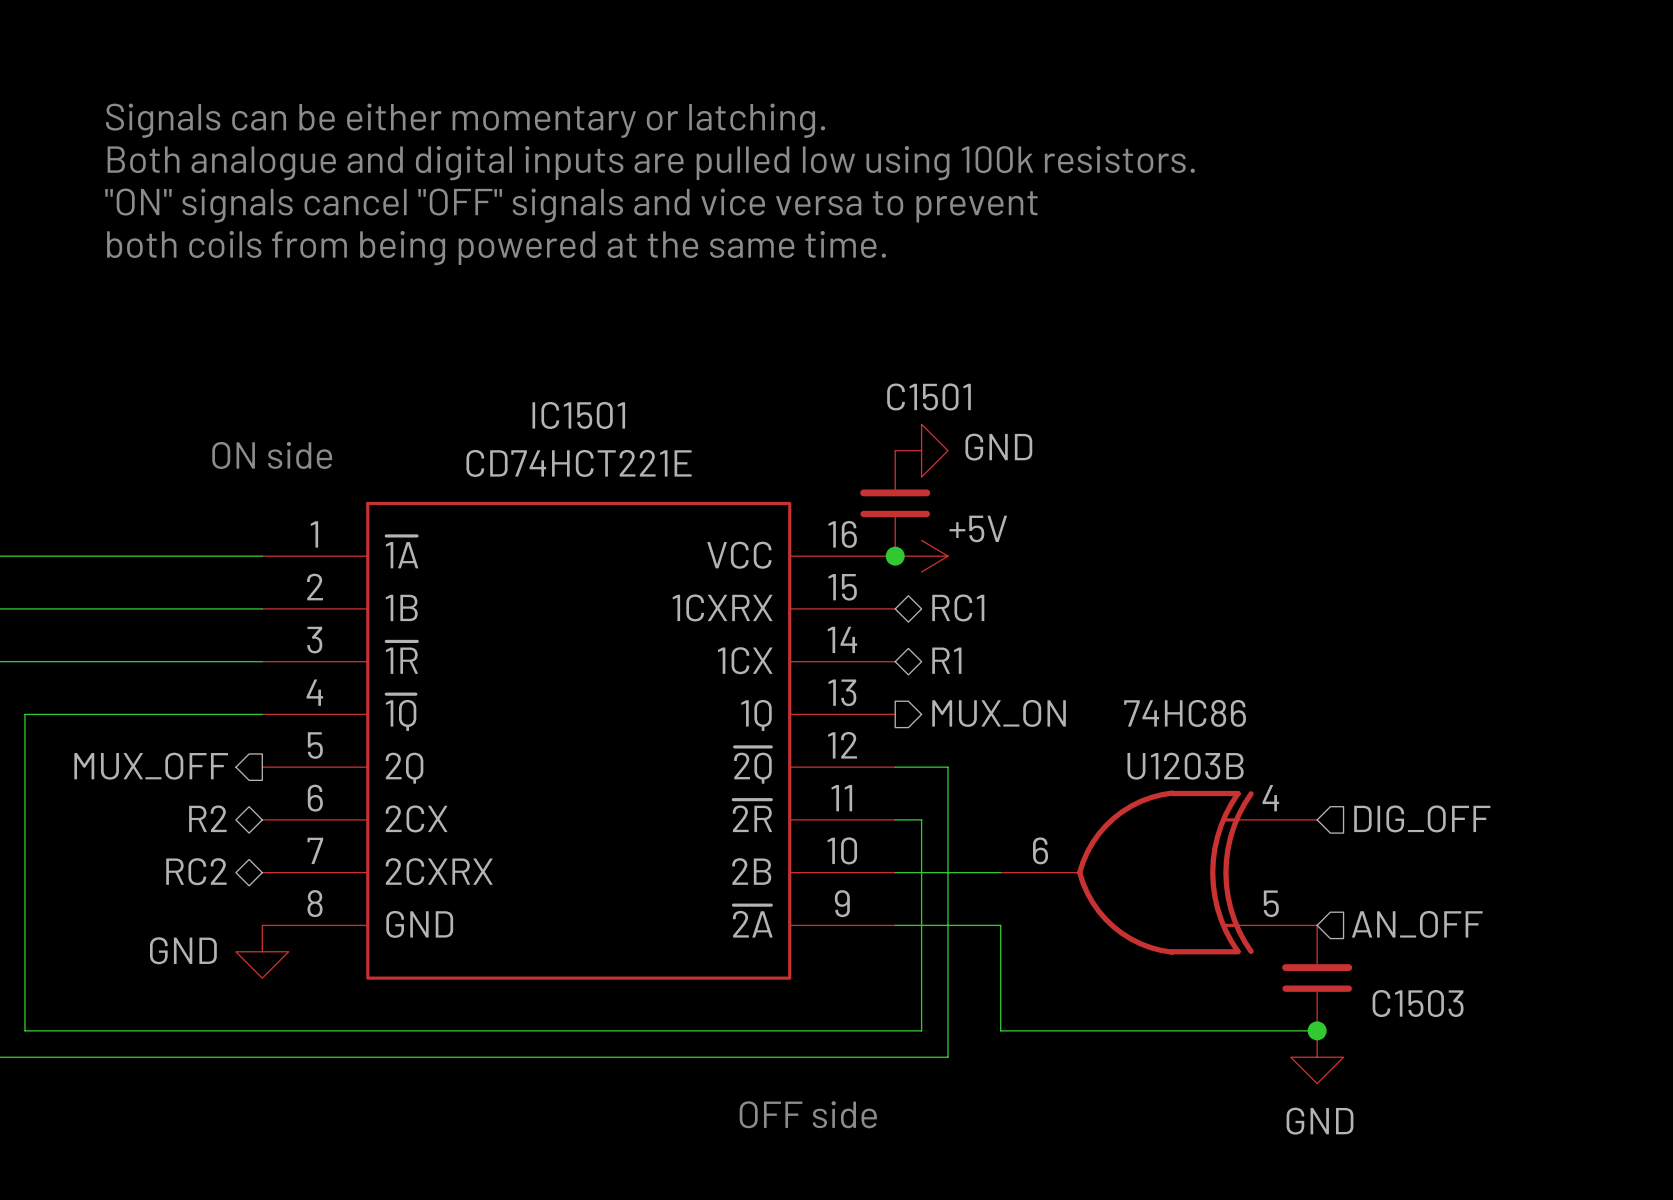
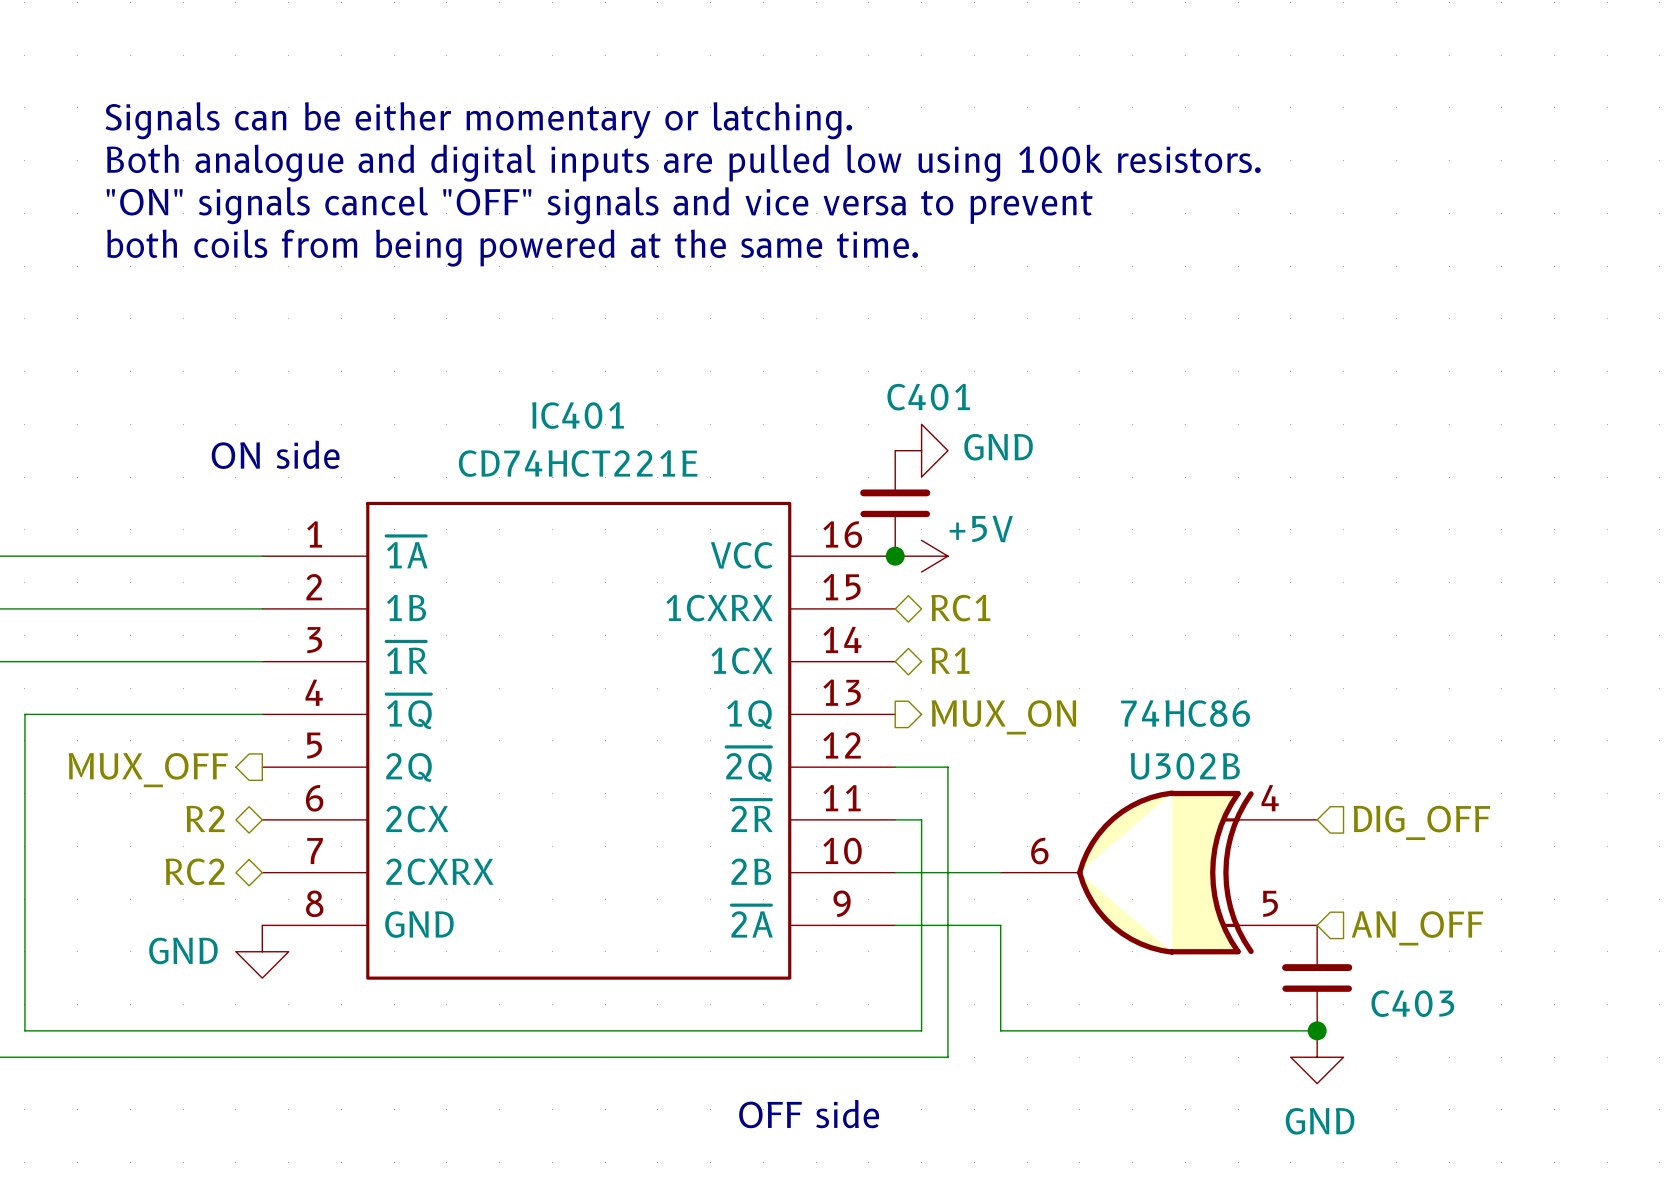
C1501 name: C1501 (929, 396) -> C401 (928, 397)
IC1501 name: IC1501 (578, 415) -> IC401 (577, 415)
U1203B name: U1203B (1185, 766) -> U302B (1185, 766)
C1503 name: C1503 (1418, 1003) -> C403 (1412, 1003)

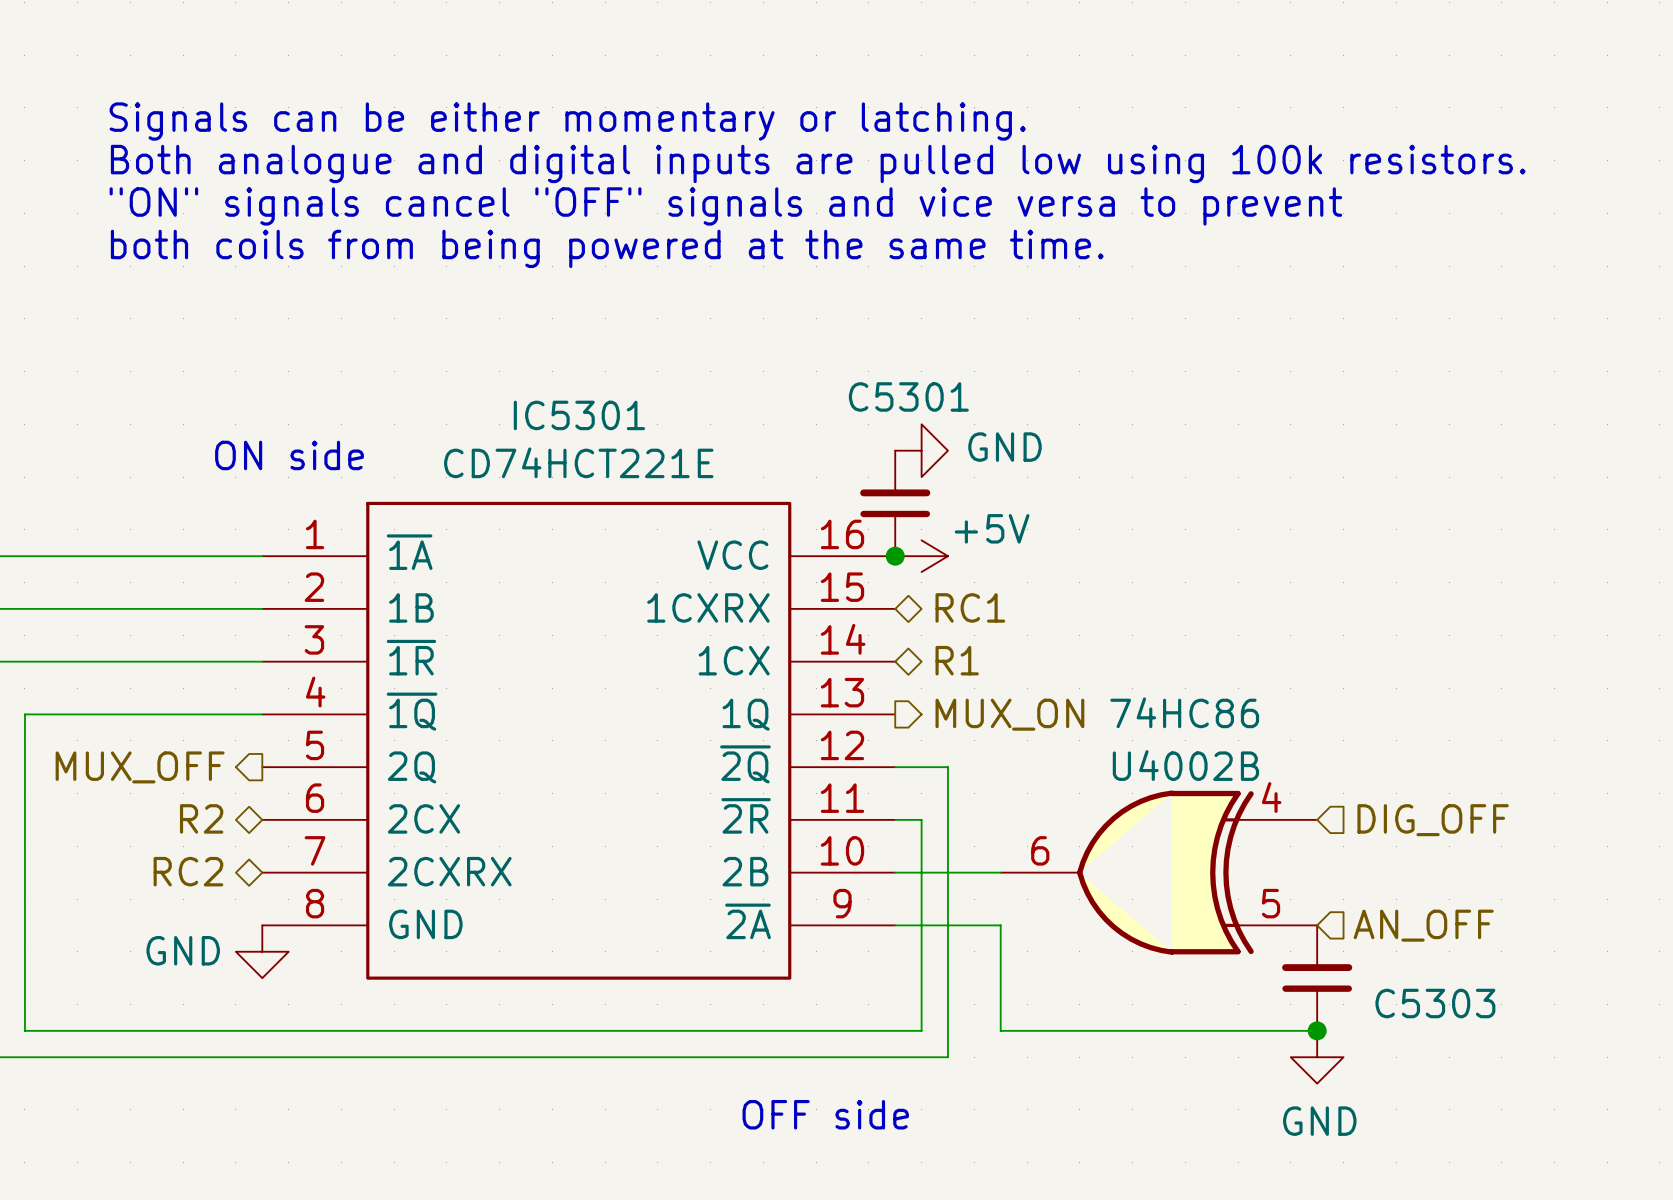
C401 name: C401 (928, 397) -> C5301 (908, 396)
IC401 name: IC401 (577, 415) -> IC5301 (579, 415)
U302B name: U302B (1185, 766) -> U4002B (1185, 765)
C403 name: C403 (1412, 1003) -> C5303 (1435, 1003)

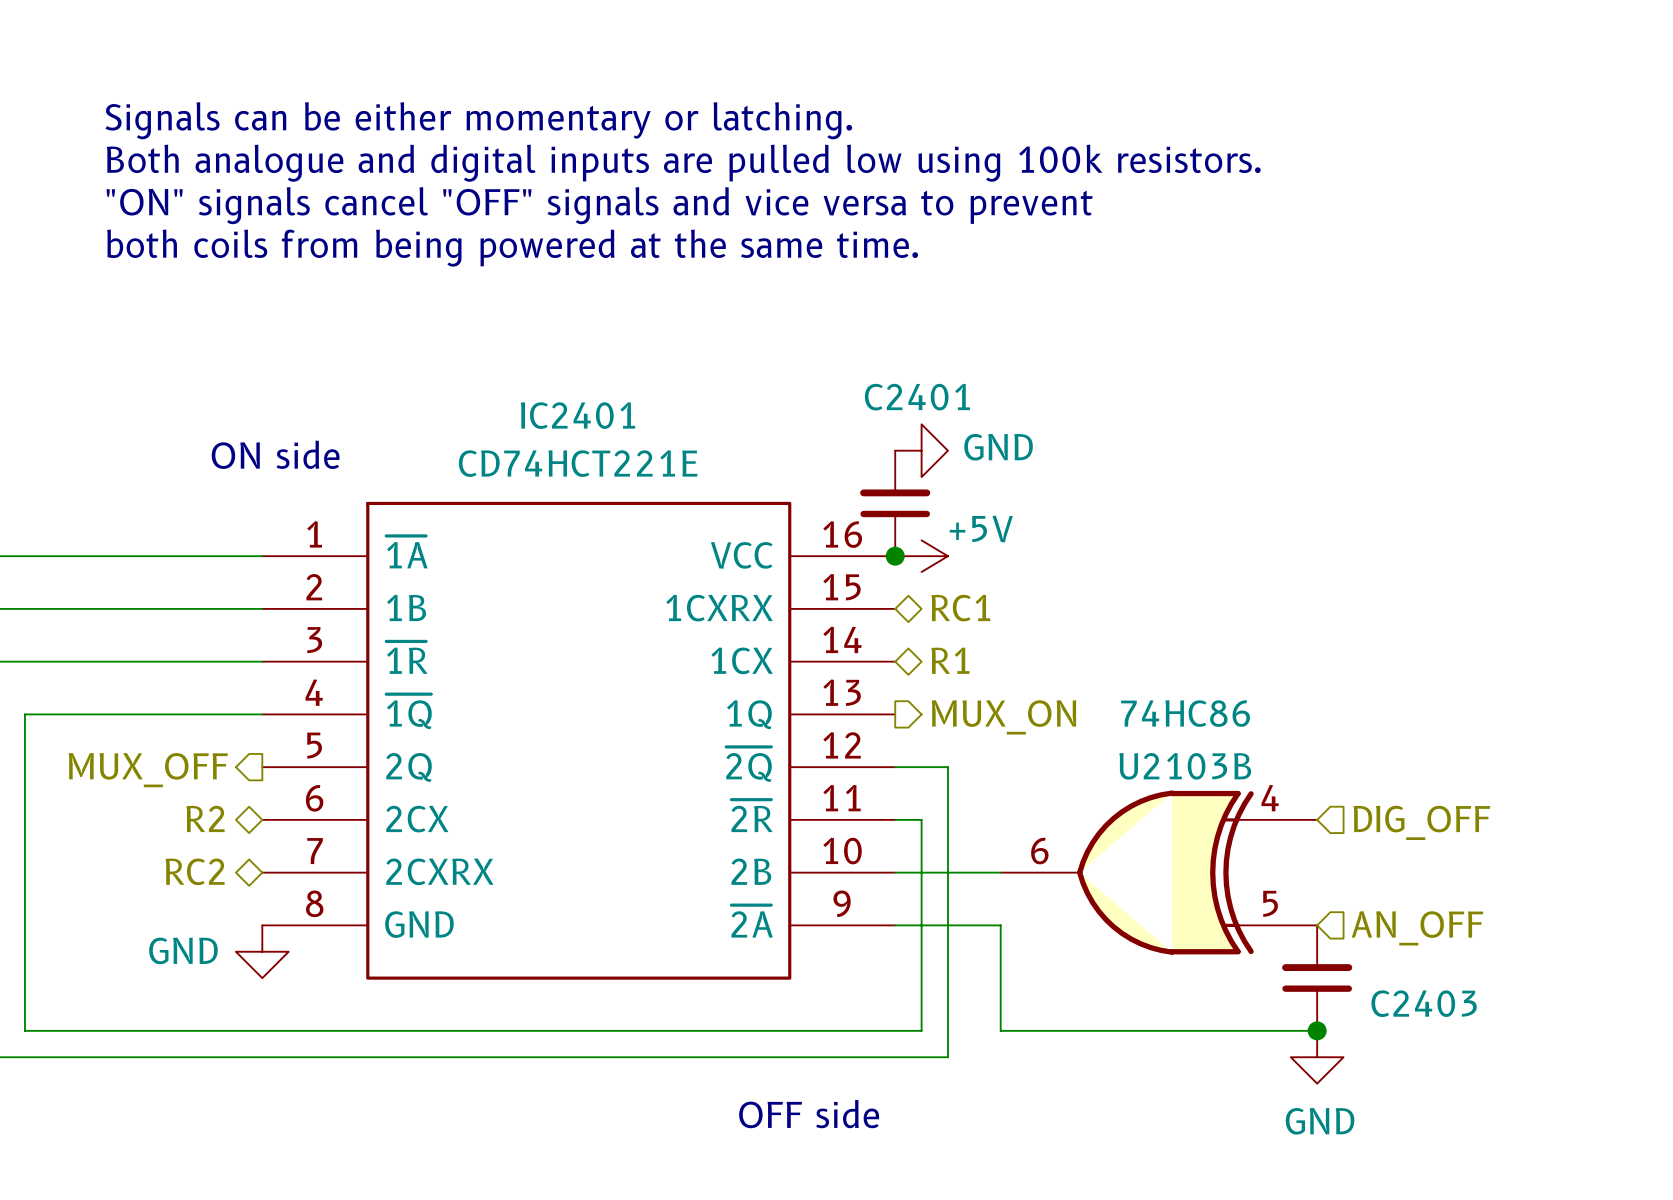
C5301 name: C5301 (908, 396) -> C2401 (917, 397)
IC5301 name: IC5301 (579, 415) -> IC2401 (577, 415)
U4002B name: U4002B (1185, 765) -> U2103B (1185, 766)
C5303 name: C5303 (1435, 1003) -> C2403 (1424, 1003)

